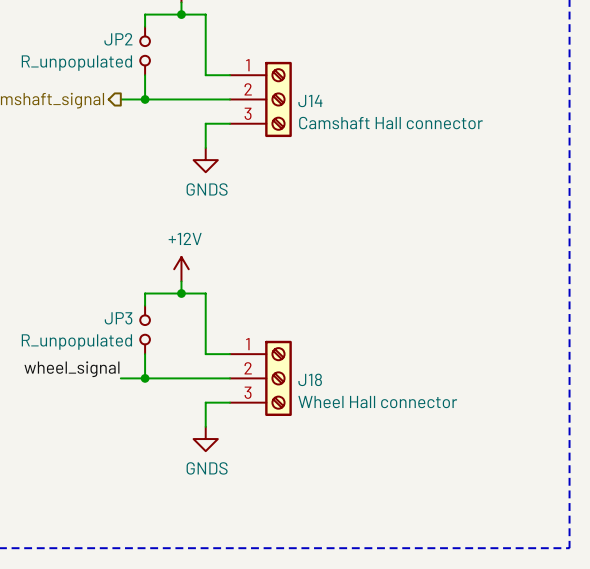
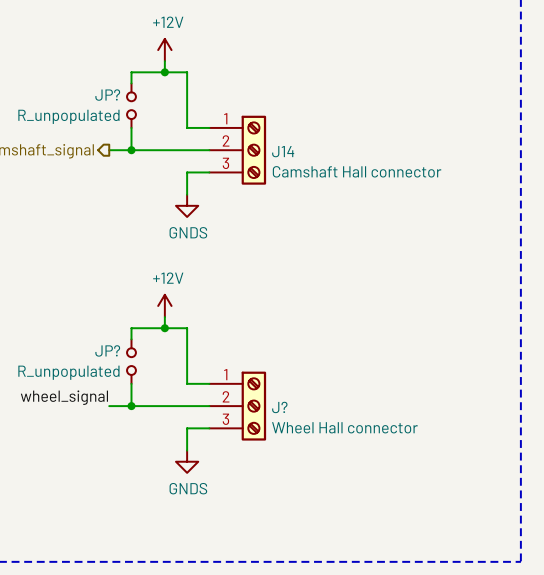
JP2 name: JP2 (118, 39) -> JP? (107, 95)
JP3 name: JP3 (118, 318) -> JP? (107, 350)
J18 name: J18 (310, 379) -> J? (279, 407)

